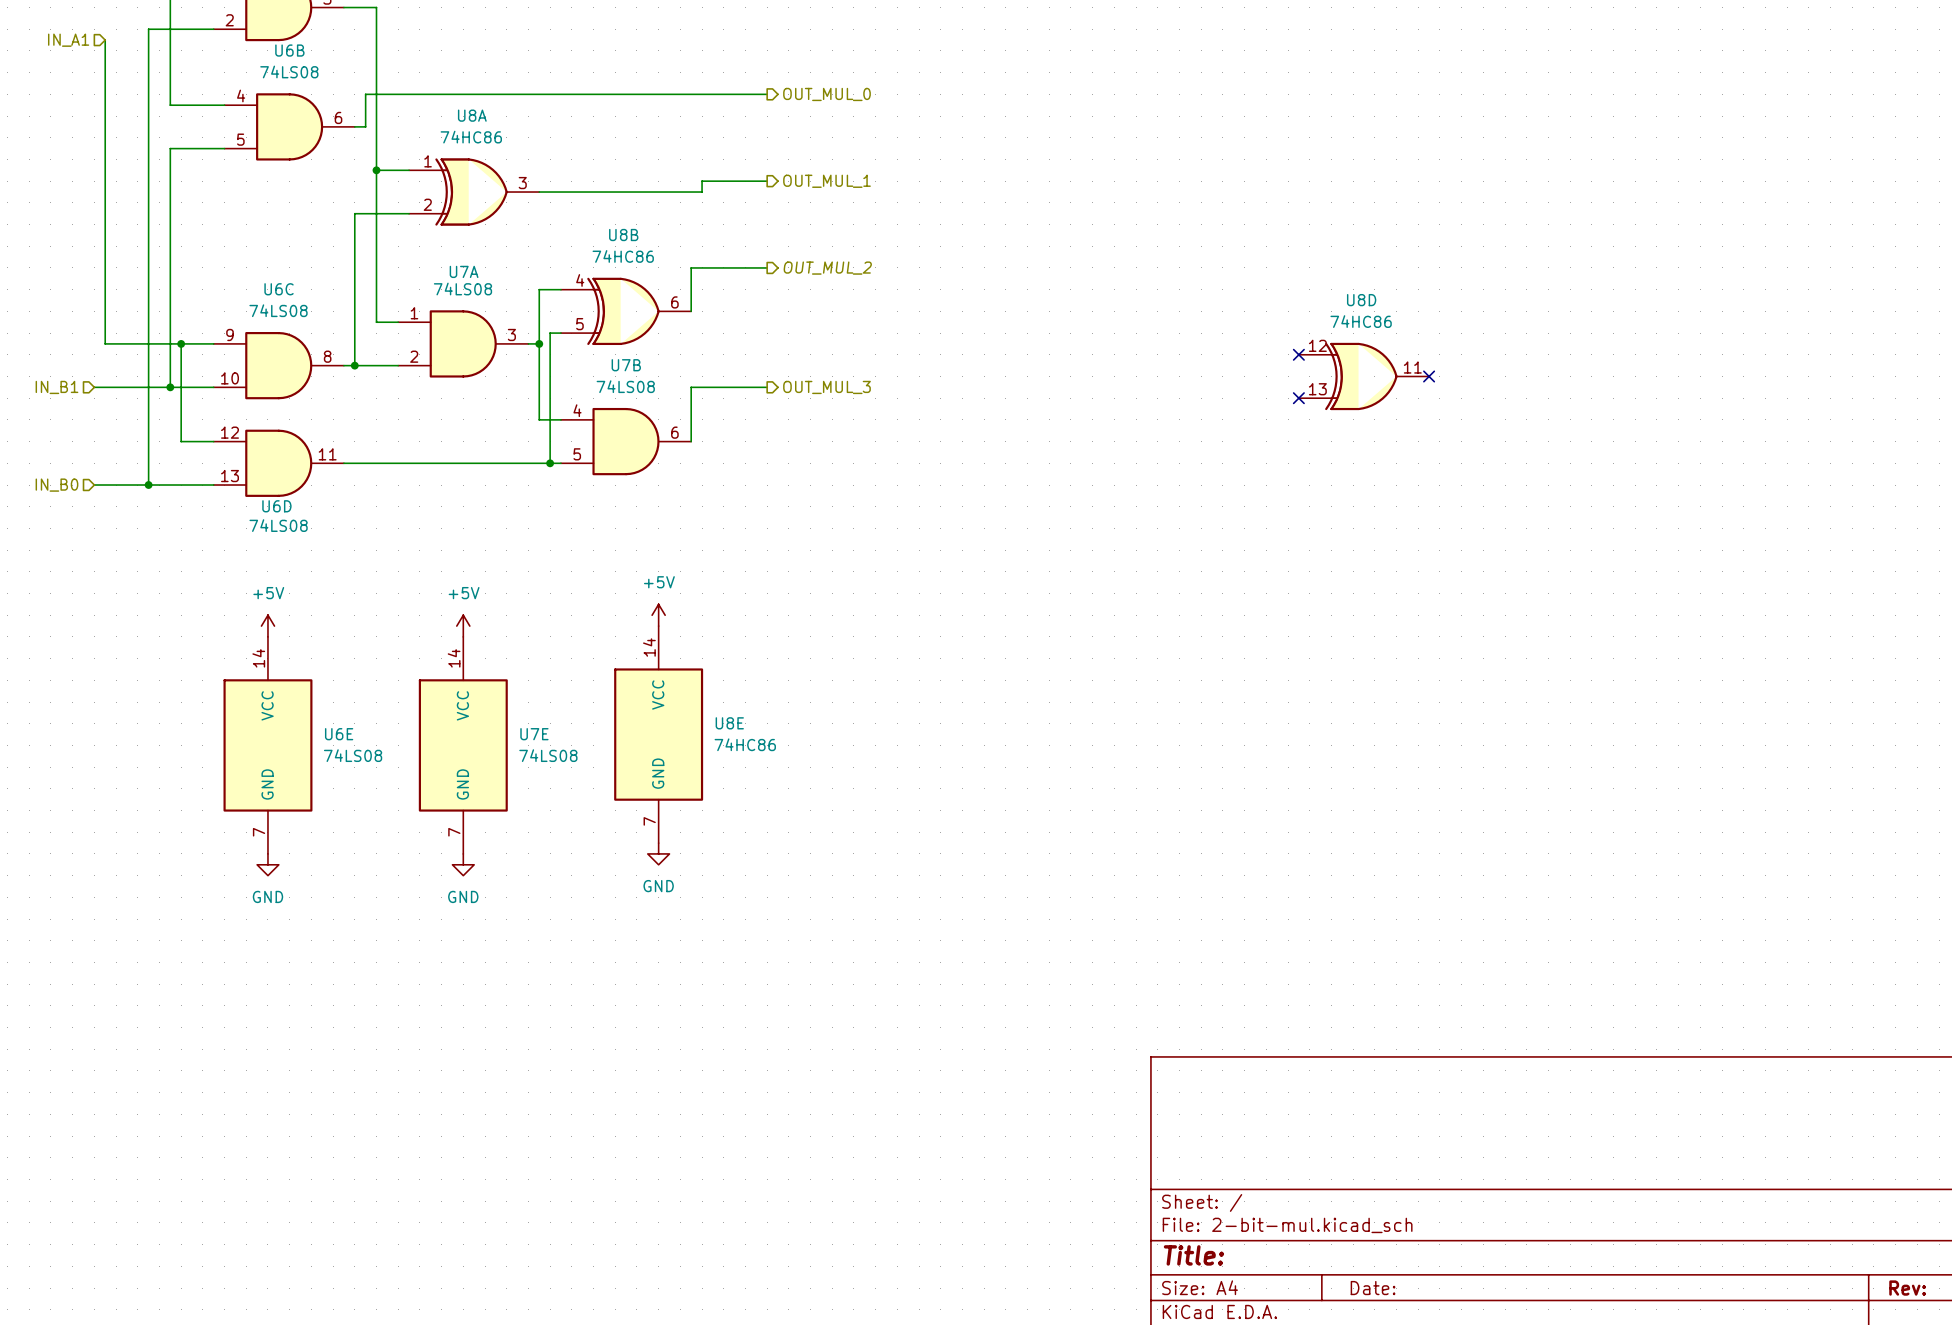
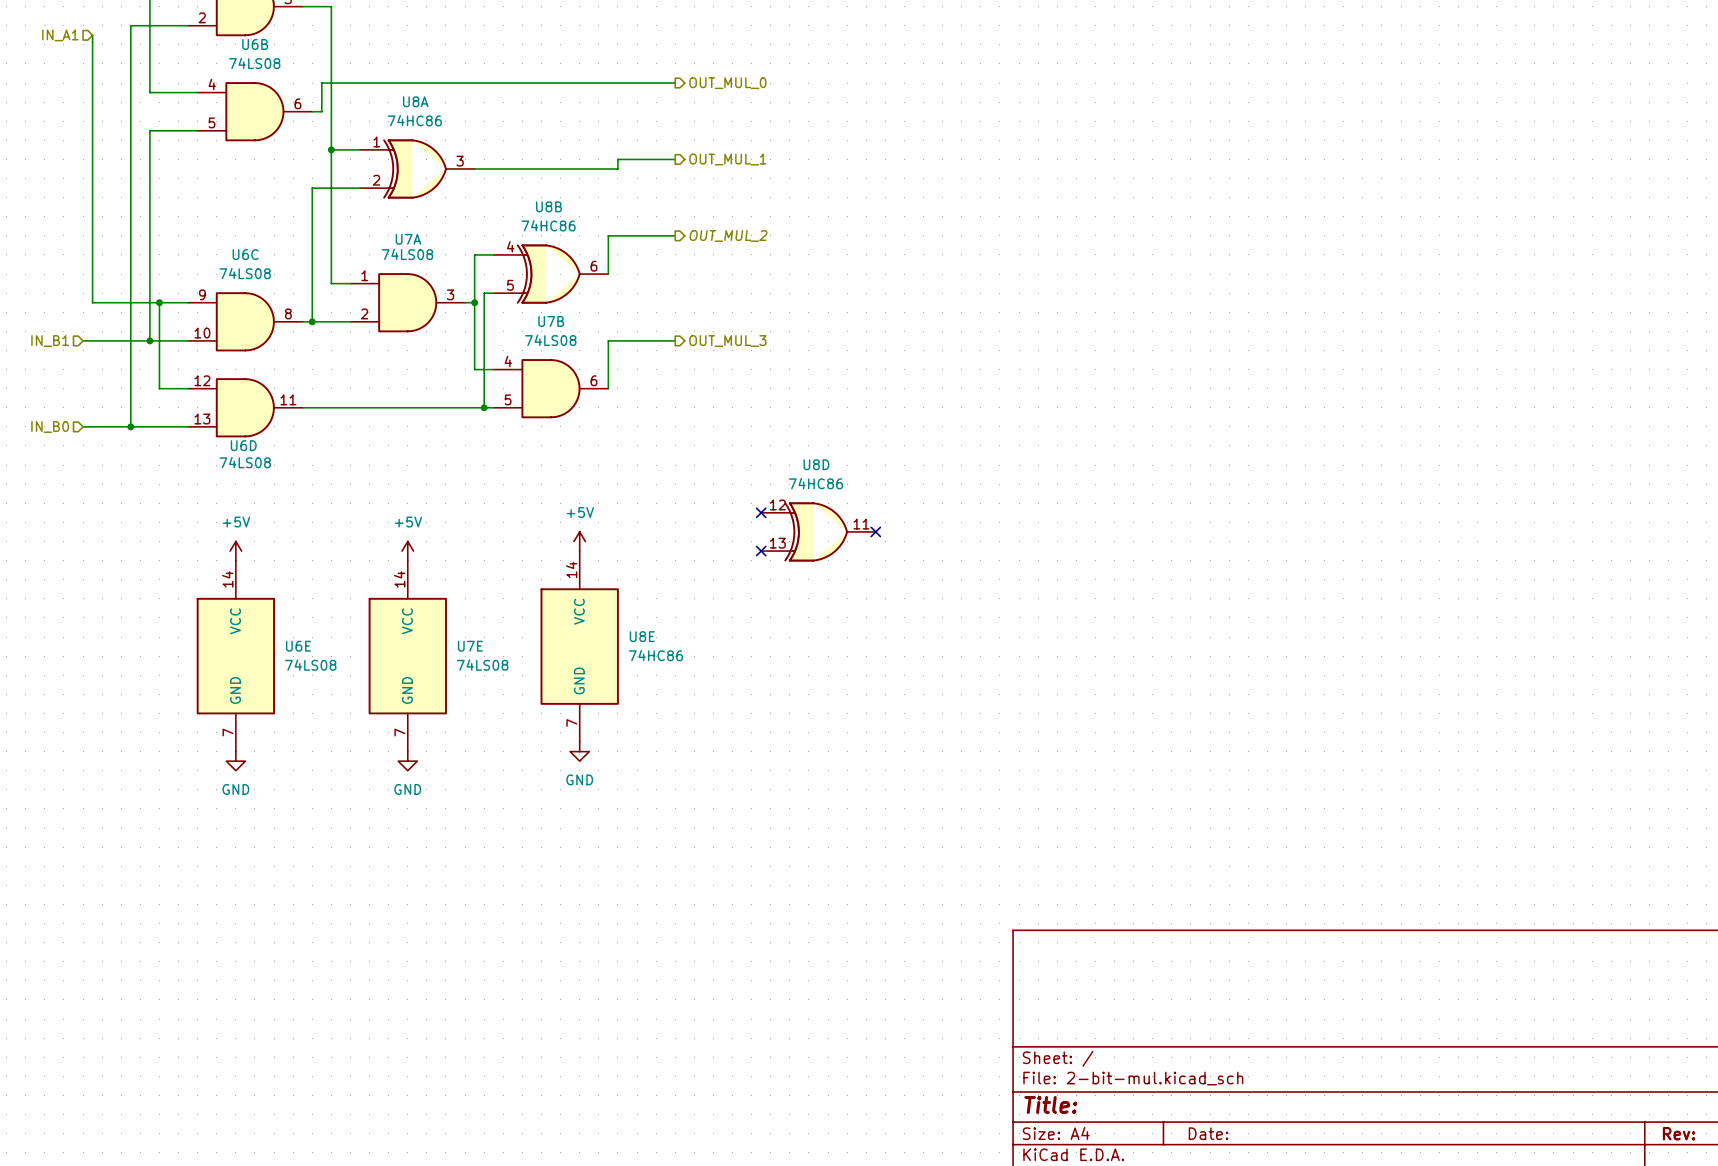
no-connect mark: (1298, 354) -> none
U8D position: (1363, 376) -> (818, 531)
no-connect mark: (1429, 376) -> none
no-connect mark: (1298, 398) -> none
no-connect mark: none -> (761, 512)
no-connect mark: none -> (875, 531)
no-connect mark: none -> (761, 551)

